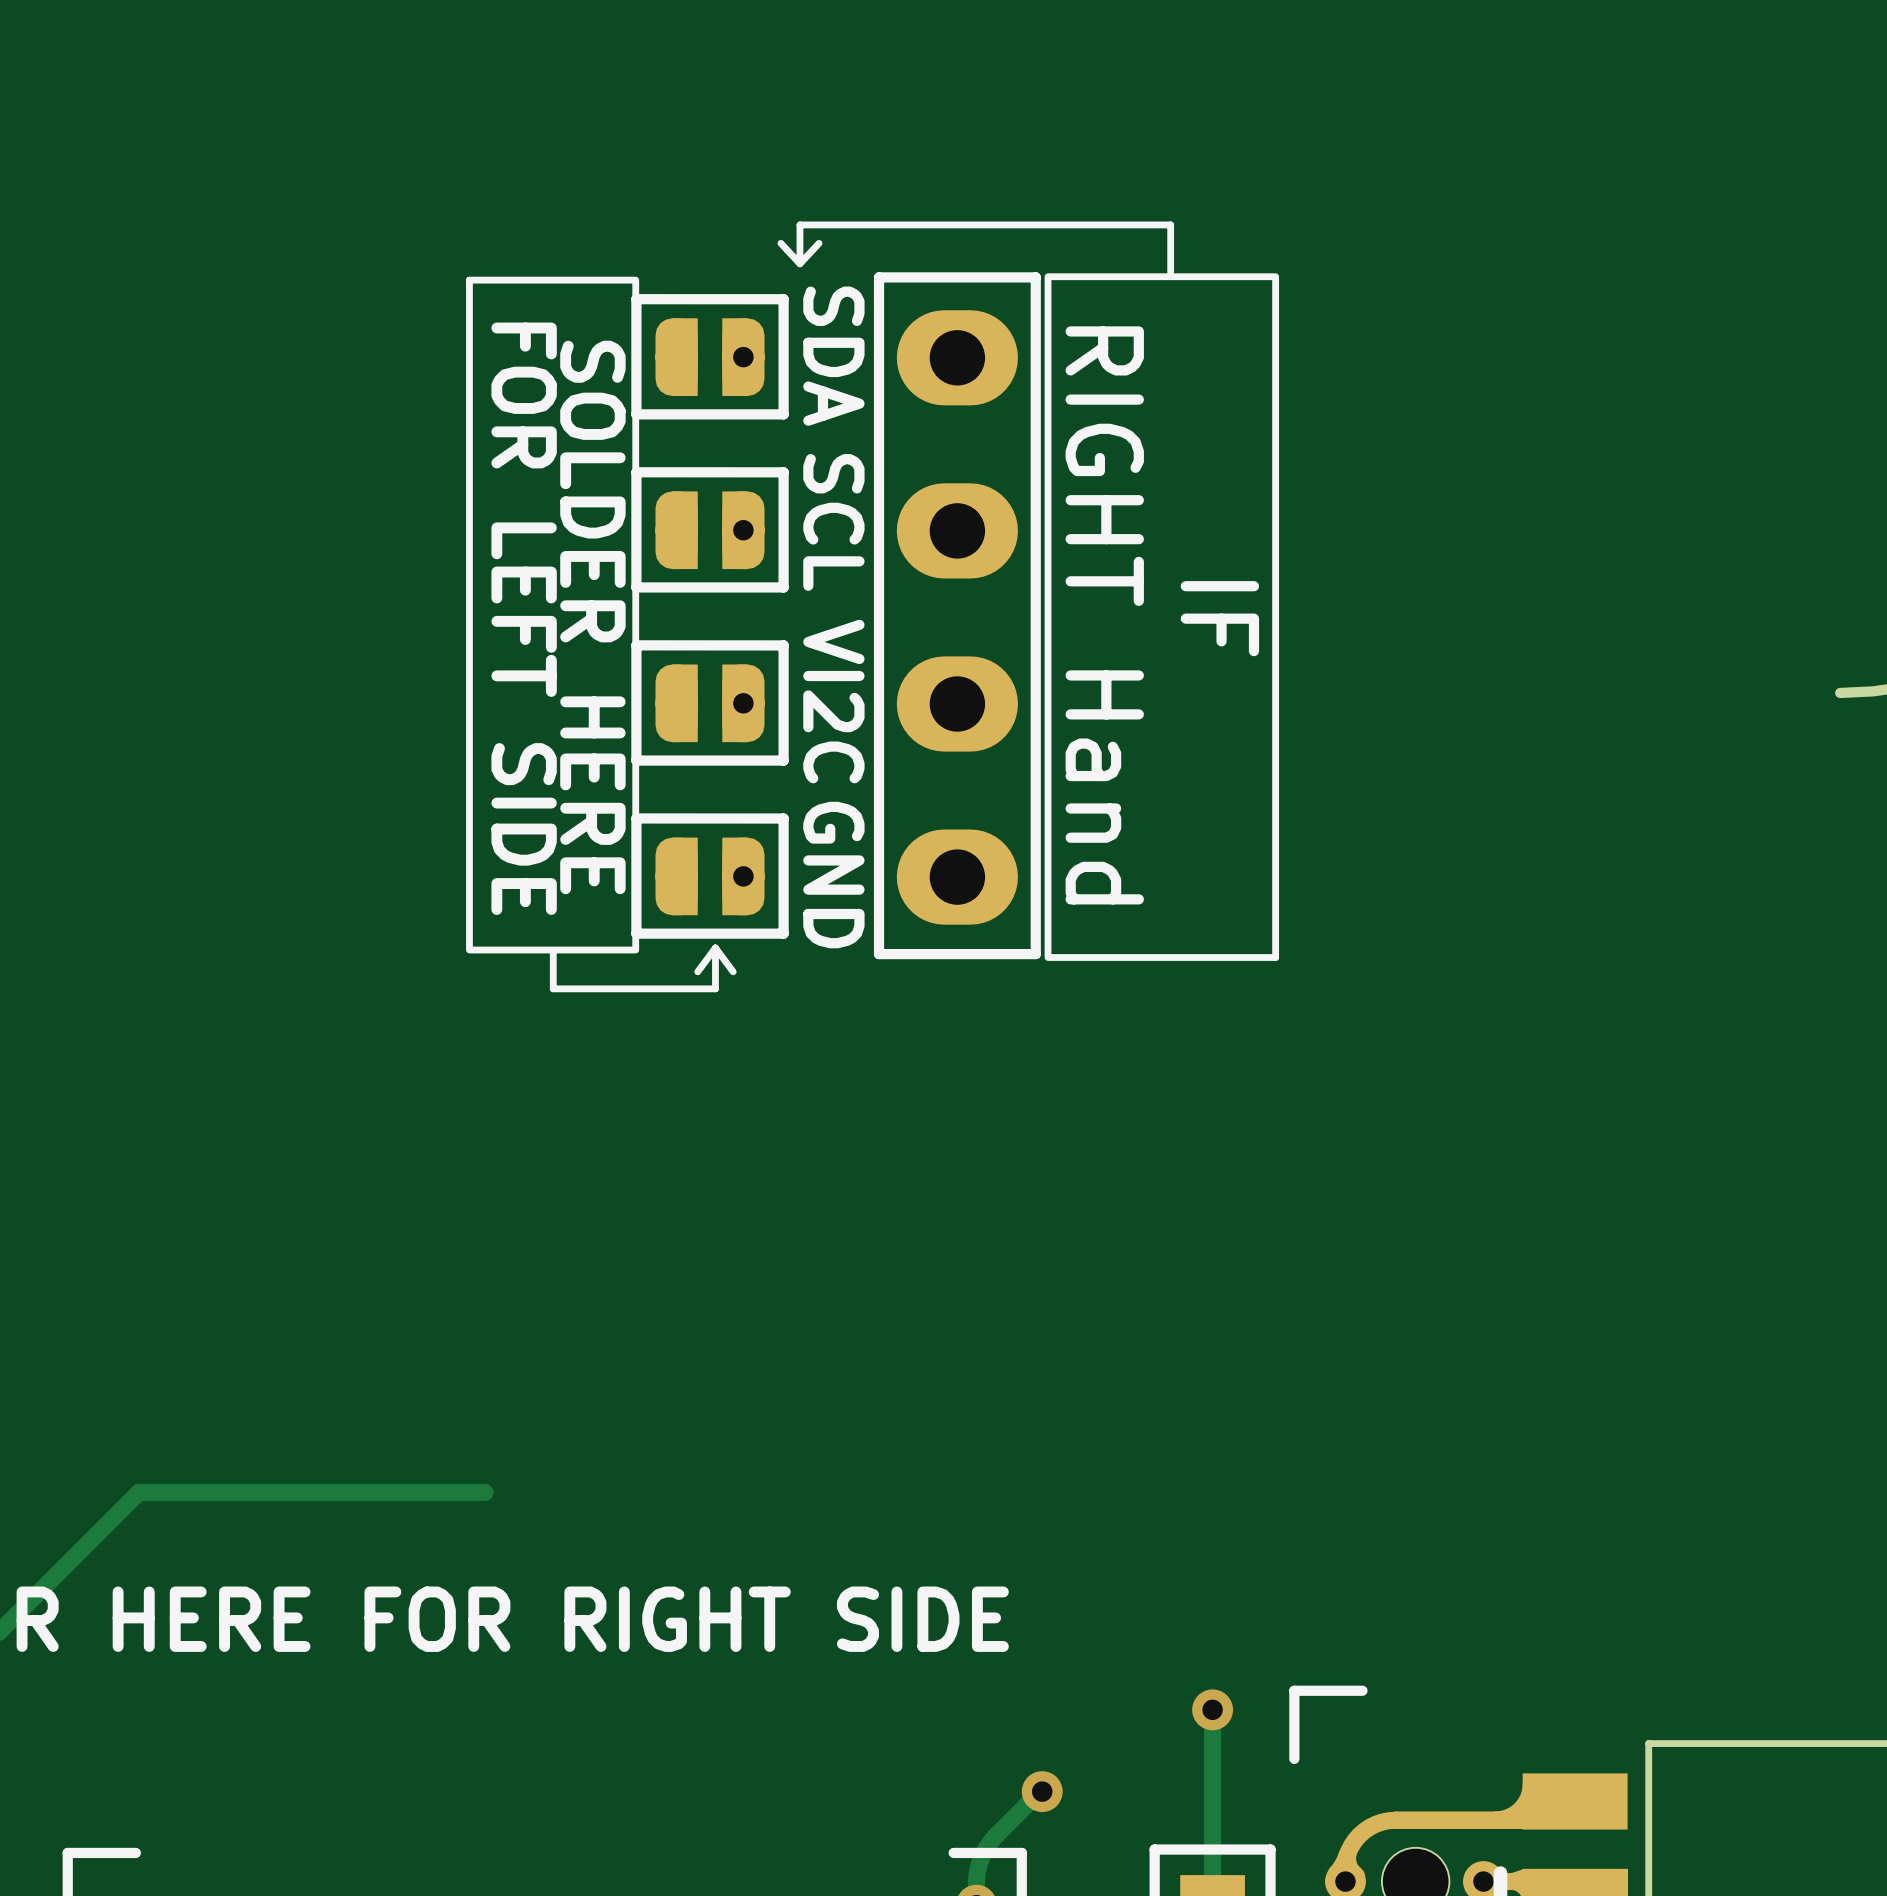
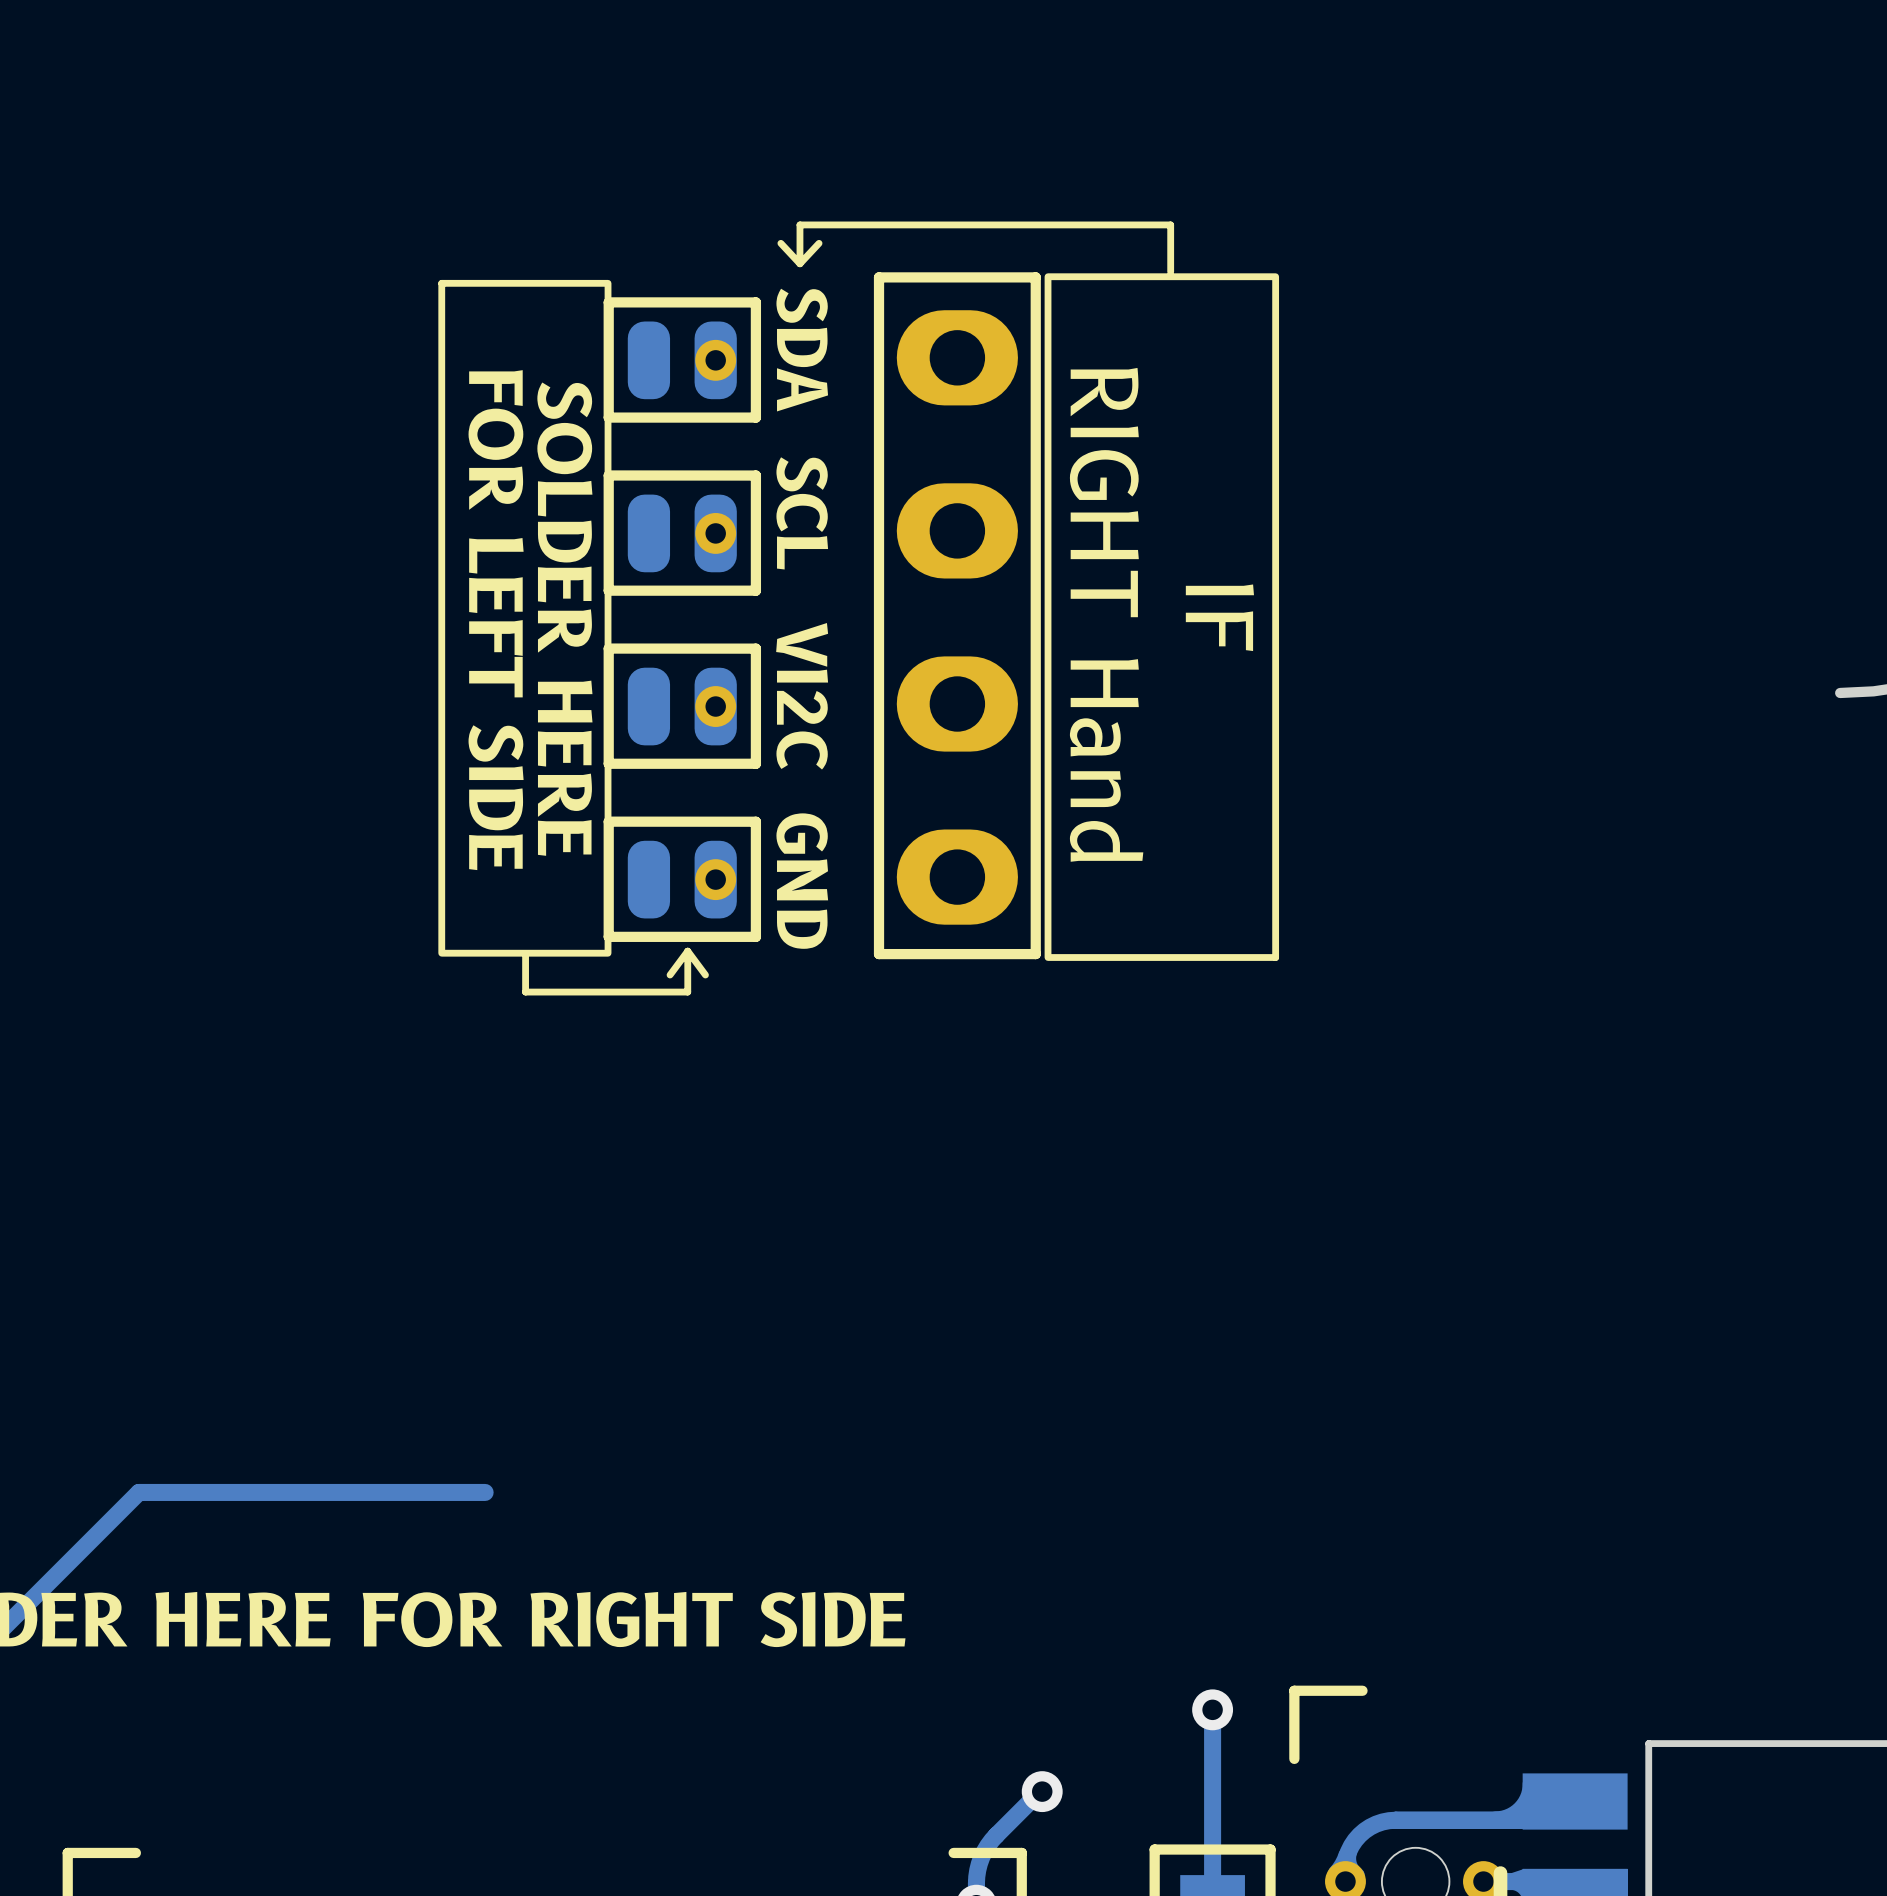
part footprint: [466, 276, 789, 993] -> [438, 279, 762, 996]
part text position: SDA (833, 356) -> SDA (802, 350)
part text position: SCL (833, 522) -> SCL (802, 513)
part text position: VI2C (833, 701) -> VI2C (802, 696)
part text position: GND (833, 875) -> GND (802, 881)

